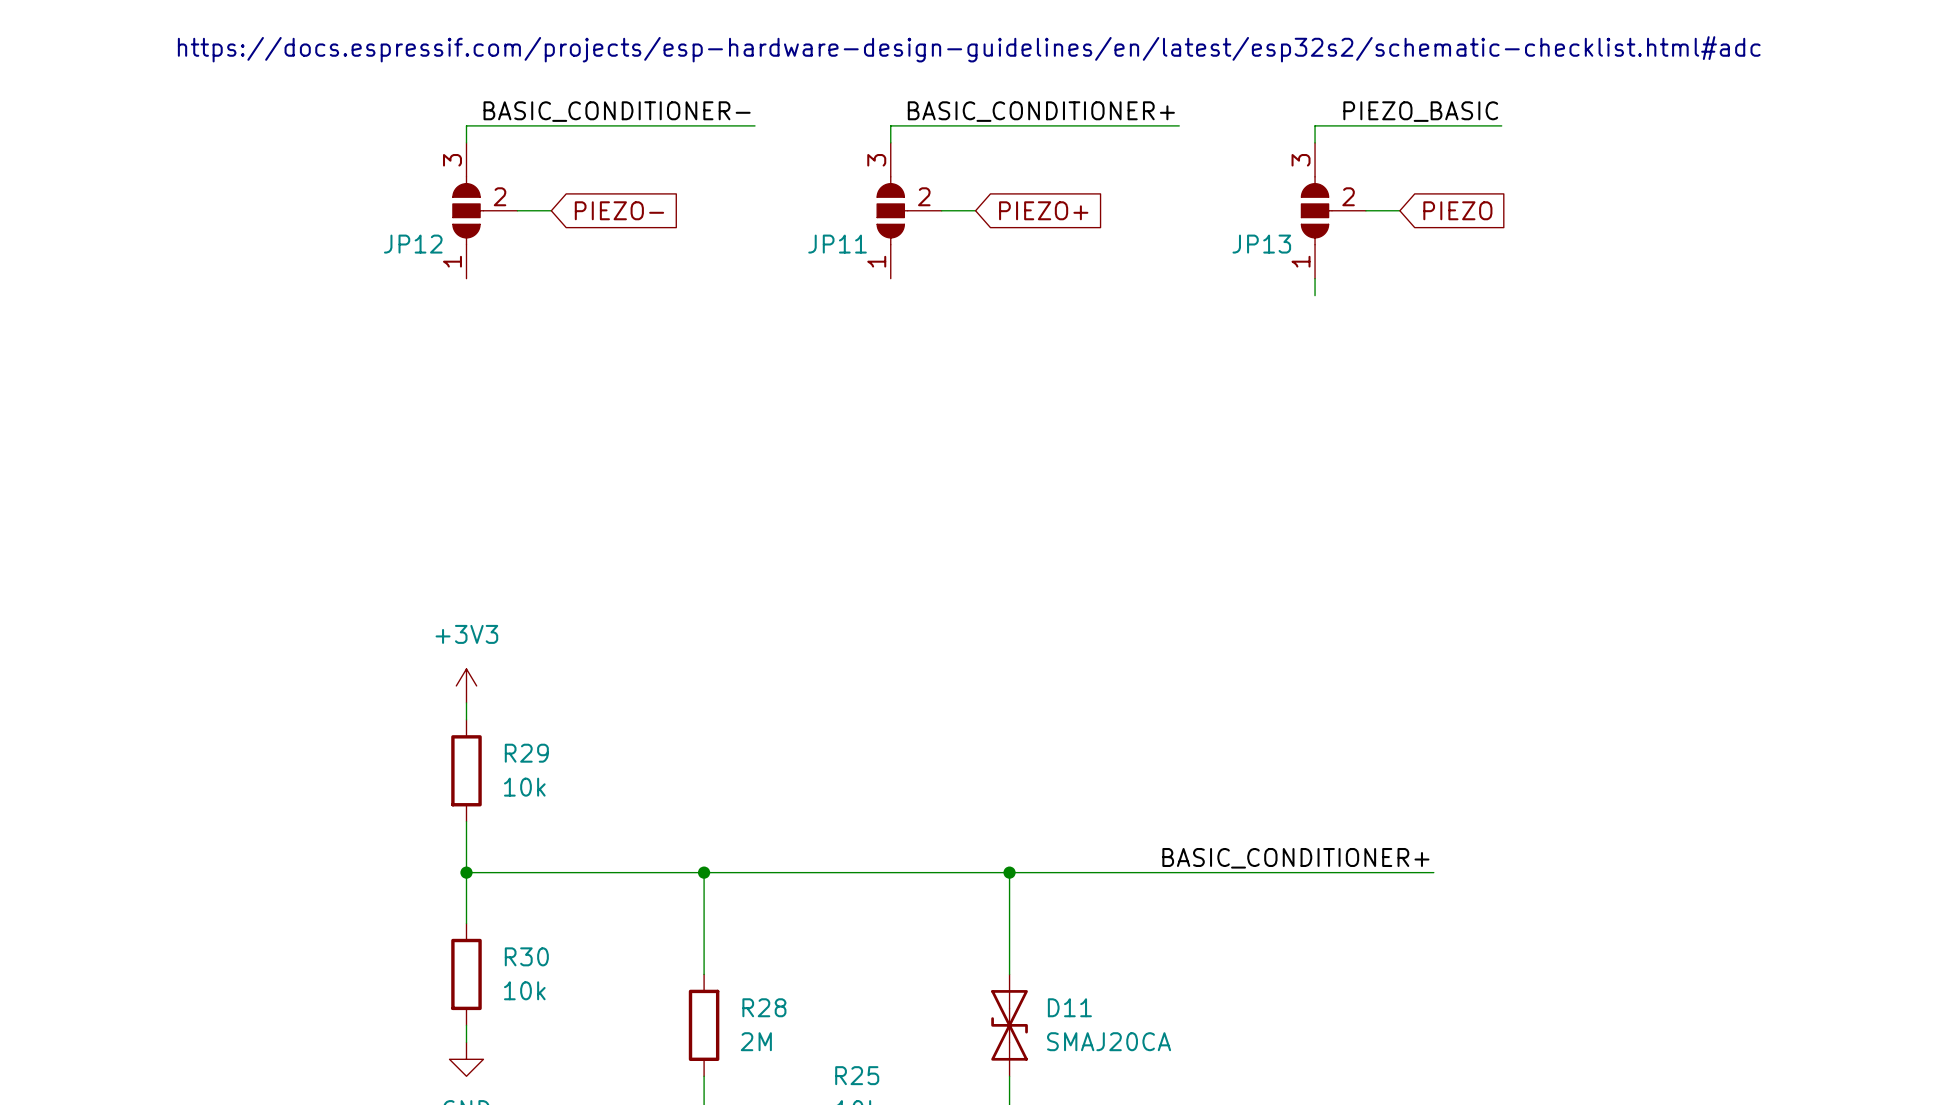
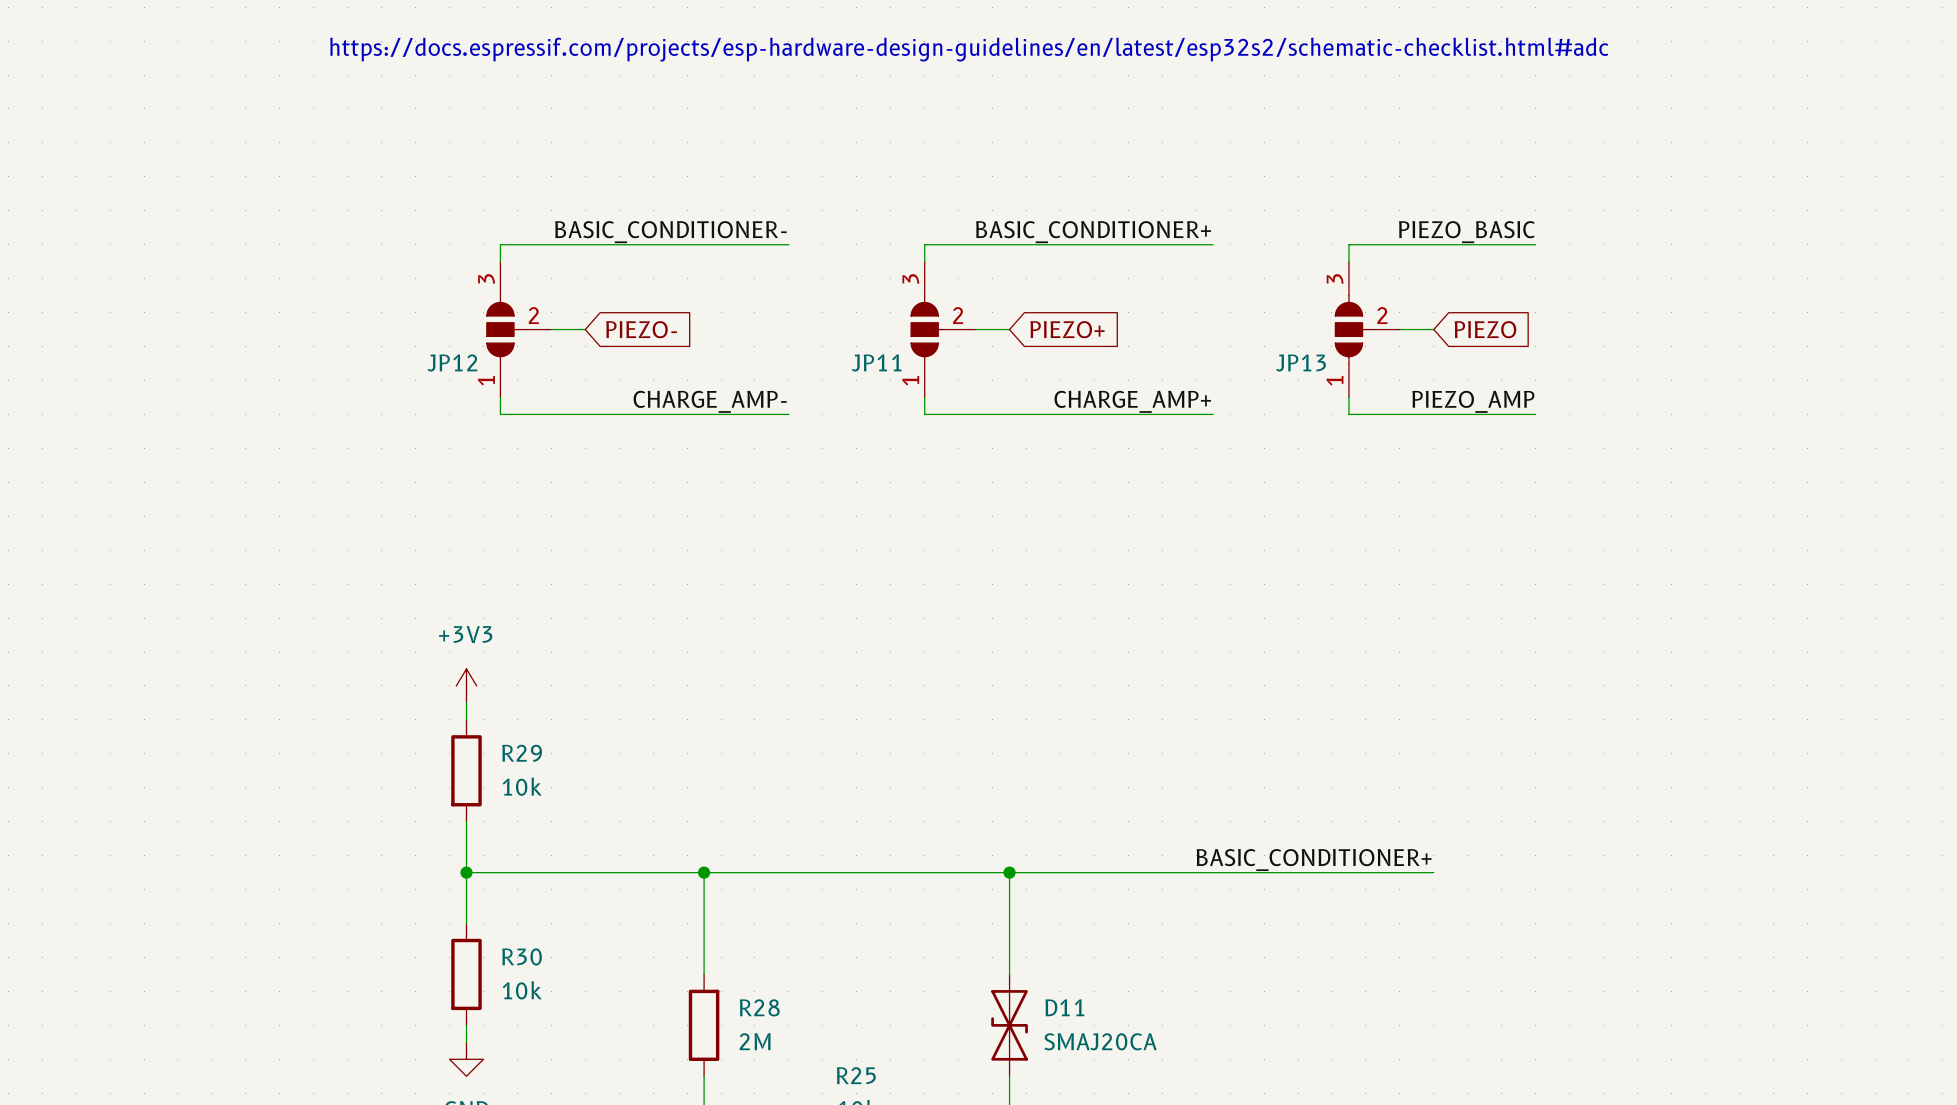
label position: BASIC_CONDITIONER- (617, 111) -> BASIC_CONDITIONER- (670, 232)
label position: BASIC_CONDITIONER+ (1041, 111) -> BASIC_CONDITIONER+ (1093, 232)
label position: PIEZO_BASIC (1420, 111) -> PIEZO_BASIC (1466, 232)
wire: (754, 125) (466, 125) (466, 142) -> (788, 244) (500, 244) (500, 261)
wire: (1179, 125) (890, 125) (890, 142) -> (1213, 244) (924, 244) (924, 261)
wire: (1501, 125) (1315, 125) (1315, 142) -> (1535, 244) (1348, 244) (1348, 261)
JP12 position: (485, 210) -> (519, 329)
wire: (517, 210) (551, 210) -> (551, 329) (585, 329)
global label position: PIEZO- (619, 210) -> PIEZO- (641, 329)
JP11 position: (909, 210) -> (943, 329)
wire: (941, 210) (975, 210) -> (975, 329) (1009, 329)
global label position: PIEZO+ (1043, 210) -> PIEZO+ (1067, 329)
JP13 position: (1333, 210) -> (1367, 329)
wire: (1365, 210) (1399, 210) -> (1399, 329) (1433, 329)
global label position: PIEZO (1457, 210) -> PIEZO (1485, 329)
wire: (1315, 278) (1315, 295) -> none
wire: none -> (500, 397) (500, 414) (788, 414)
wire: none -> (924, 397) (924, 414) (1213, 414)
wire: none -> (1348, 397) (1348, 414) (1535, 414)
label: none -> CHARGE_AMP- (710, 401)
label: none -> CHARGE_AMP+ (1132, 401)
label: none -> PIEZO_AMP (1473, 401)

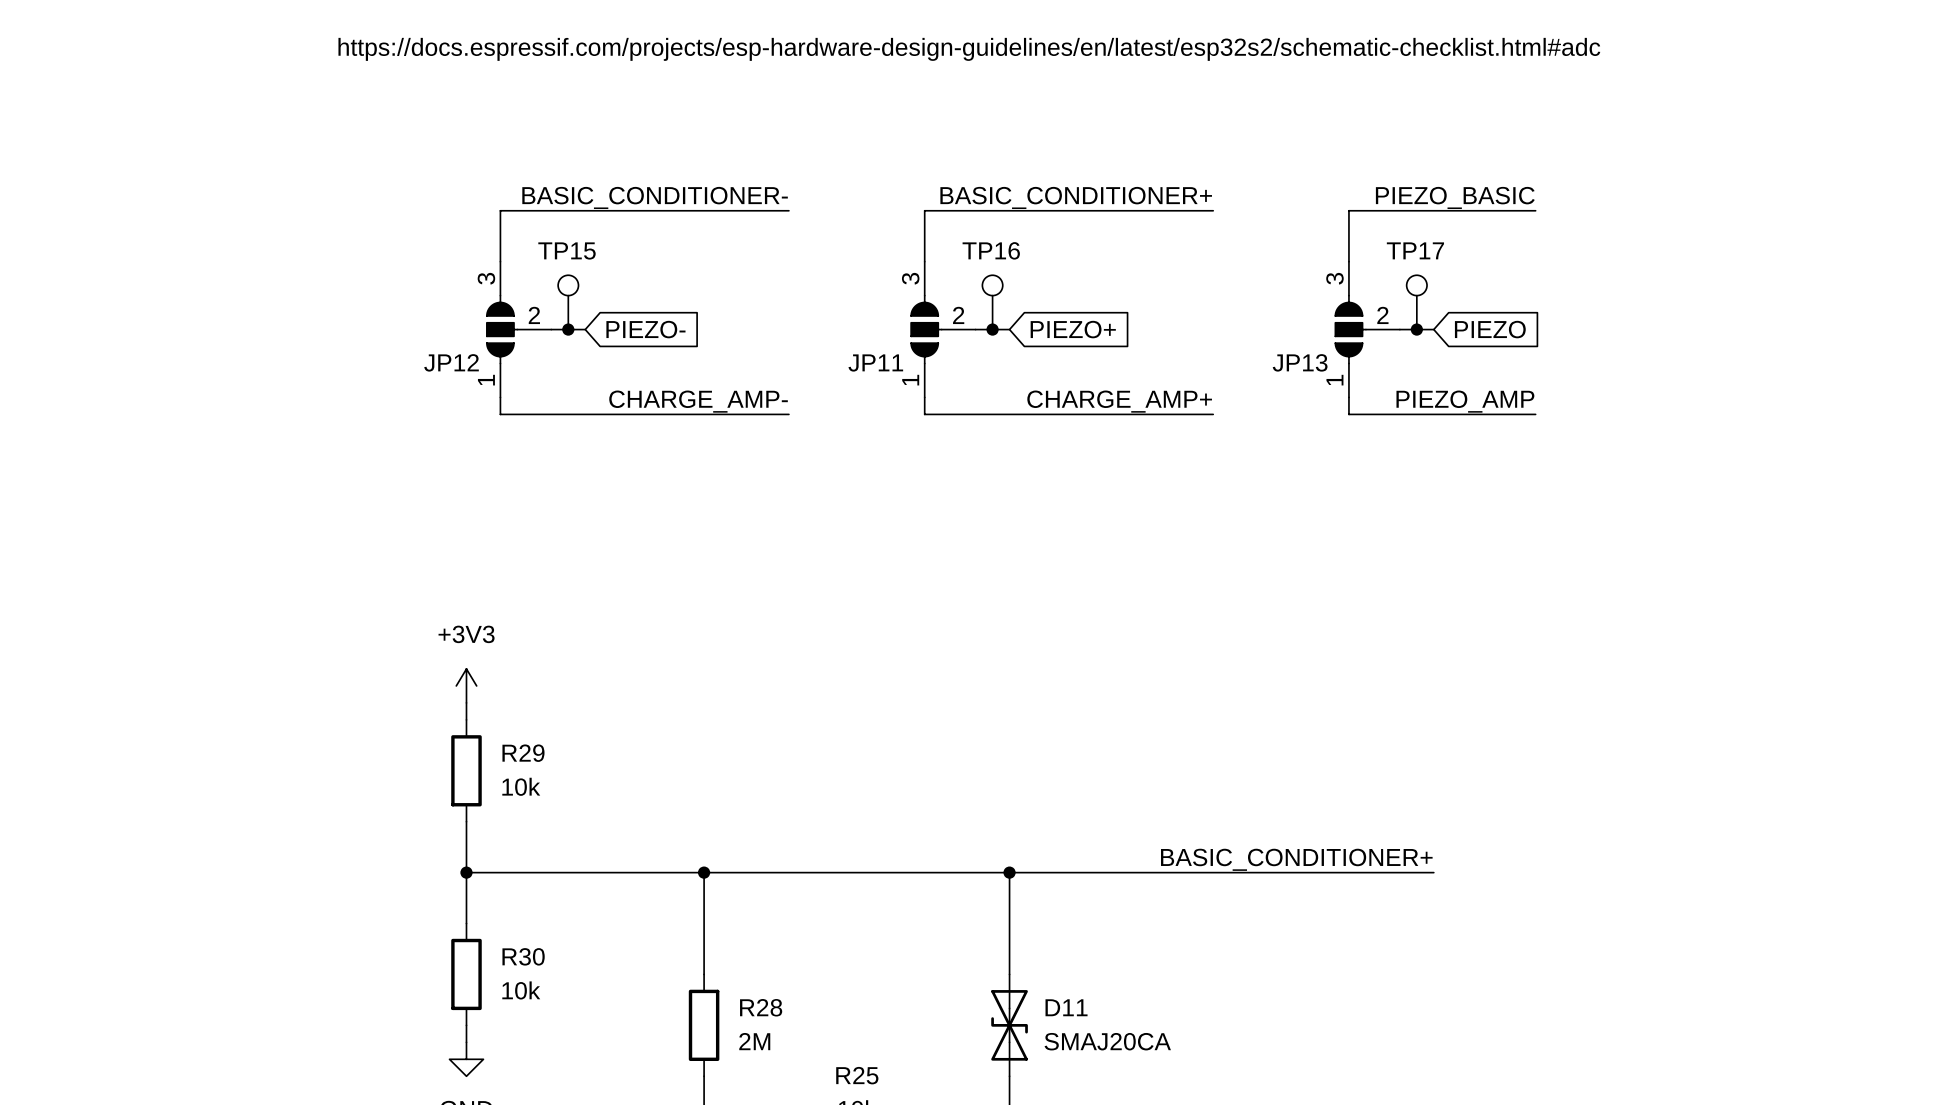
label position: BASIC_CONDITIONER- (670, 232) -> BASIC_CONDITIONER- (655, 197)
label position: BASIC_CONDITIONER+ (1093, 232) -> BASIC_CONDITIONER+ (1076, 197)
label position: PIEZO_BASIC (1466, 232) -> PIEZO_BASIC (1455, 197)
wire: (500, 244) (788, 244) -> (500, 244) (500, 210) (788, 210)
wire: (924, 244) (1213, 244) -> (924, 244) (924, 210) (1213, 210)
wire: (1348, 244) (1535, 244) -> (1348, 244) (1348, 210) (1535, 210)
TP15: none -> (568, 302)
TP16: none -> (992, 302)
TP17: none -> (1416, 302)
junction: none -> (568, 329)
junction: none -> (992, 329)
junction: none -> (1416, 329)

